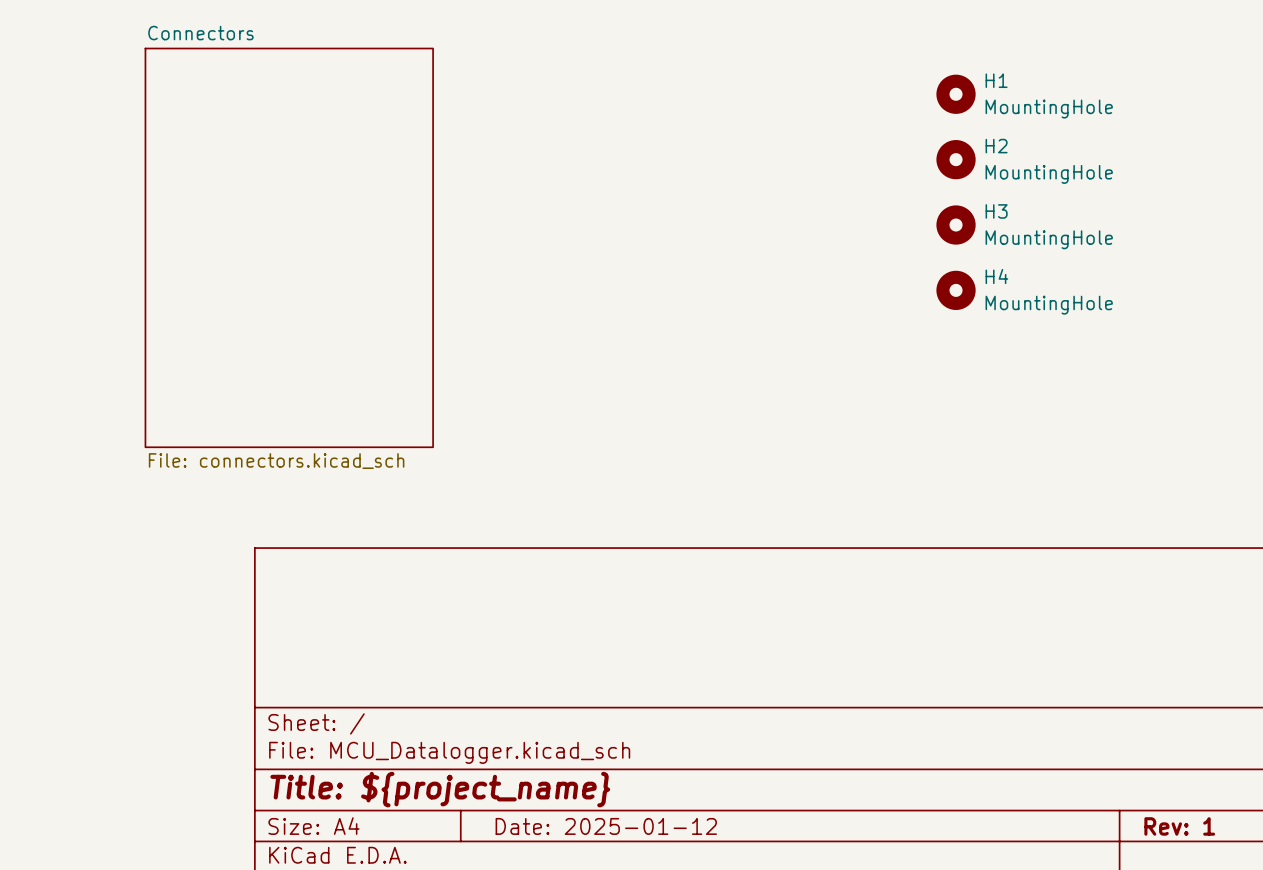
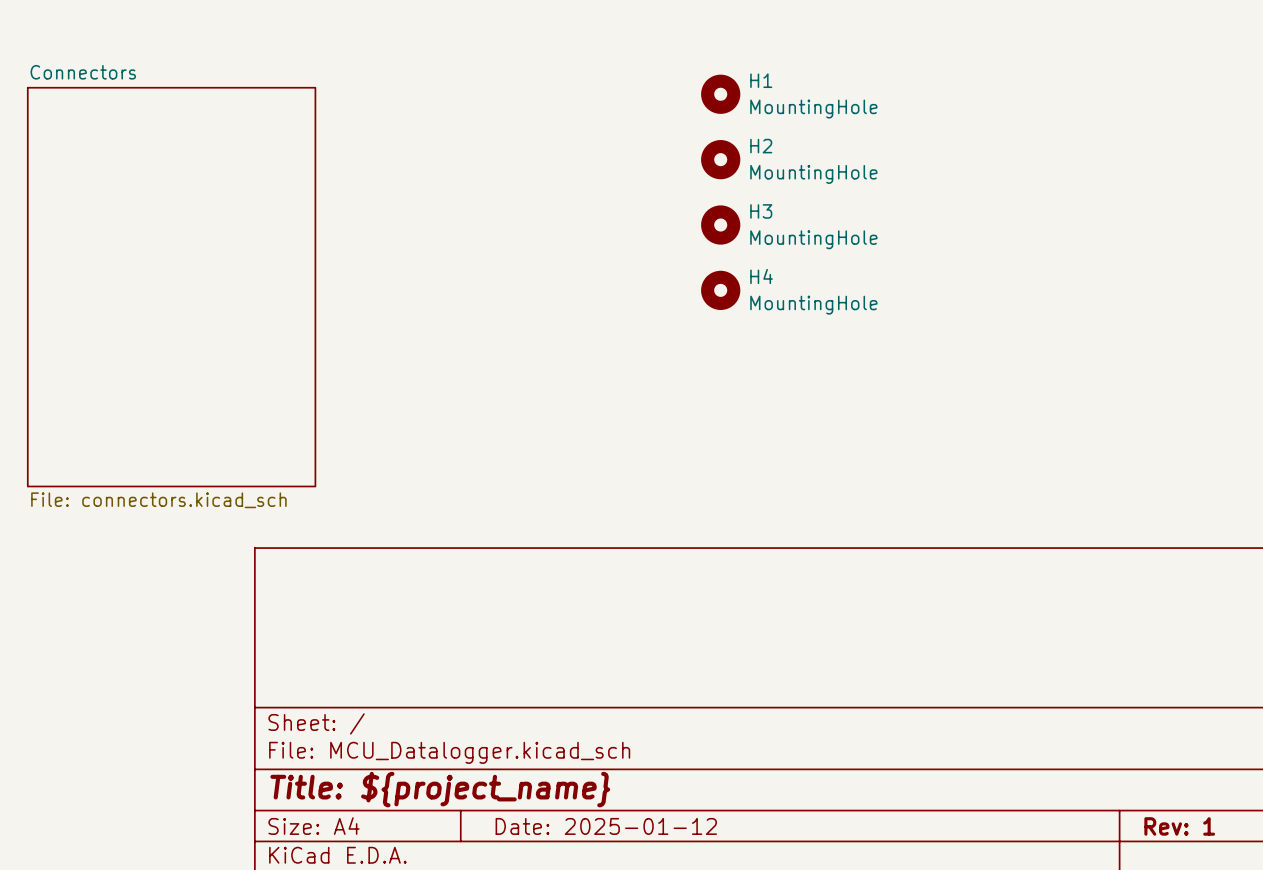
H1 position: (956, 94) -> (720, 94)
H2 position: (956, 159) -> (720, 159)
H3 position: (956, 225) -> (720, 225)
sheet Connectors position: (289, 247) -> (171, 287)
H4 position: (956, 290) -> (720, 290)

